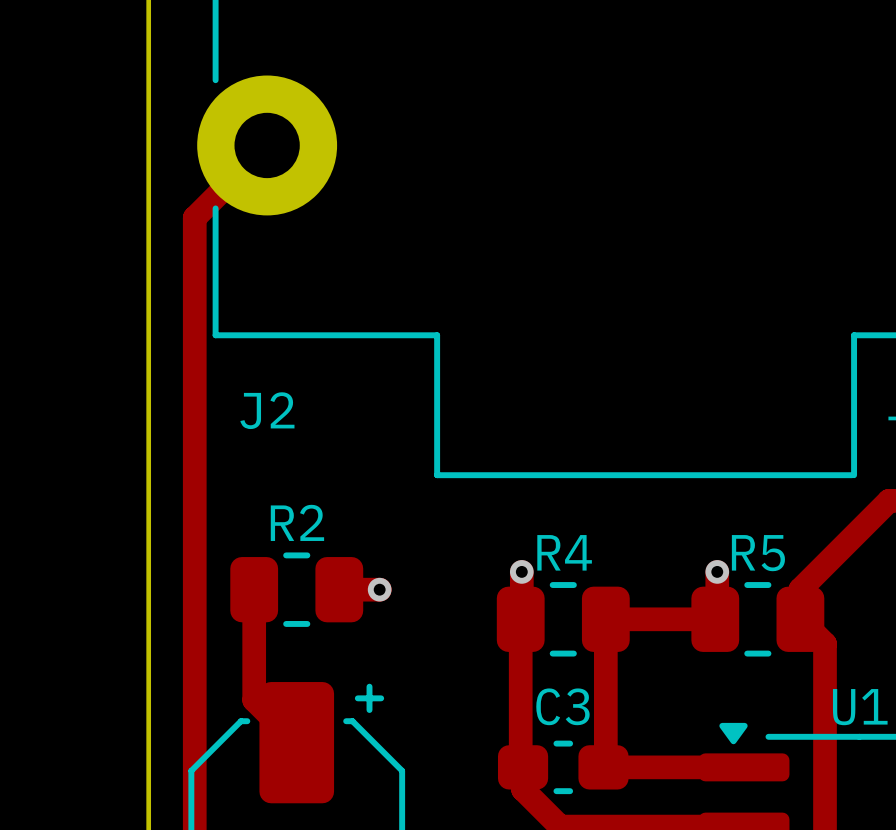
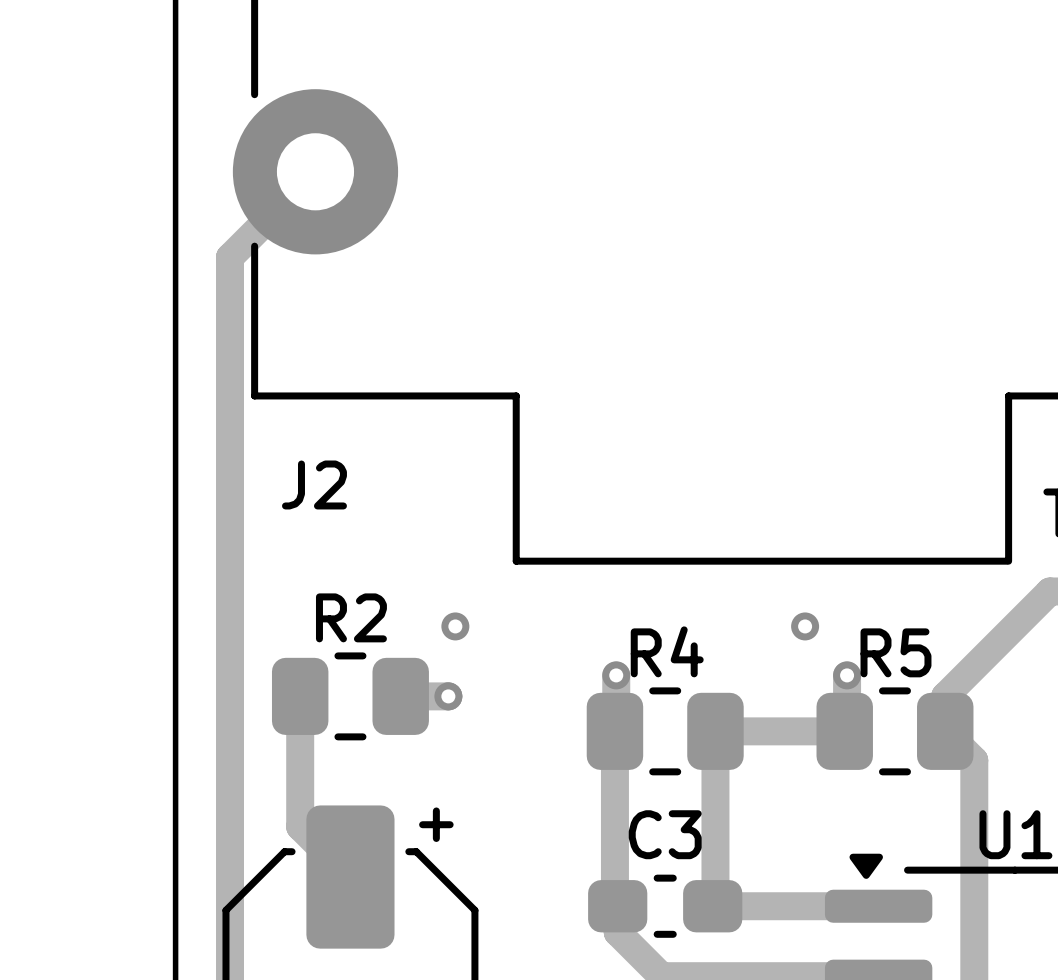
via: none -> (455, 626)
via: none -> (805, 626)

